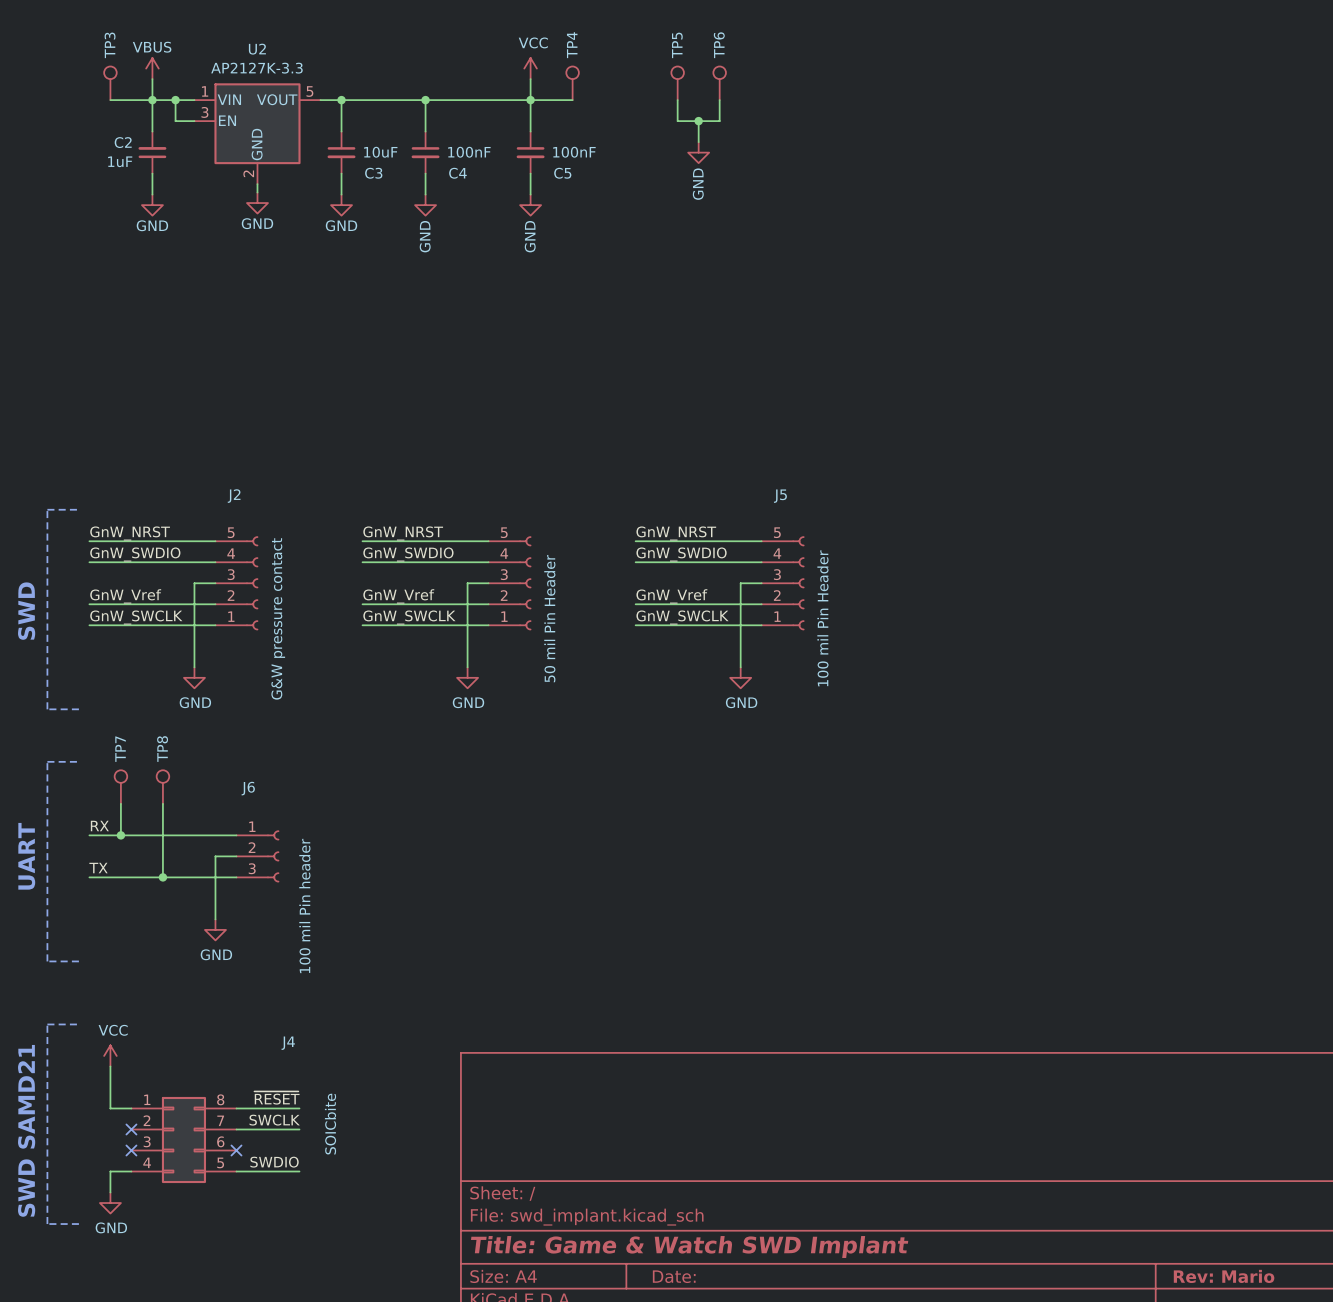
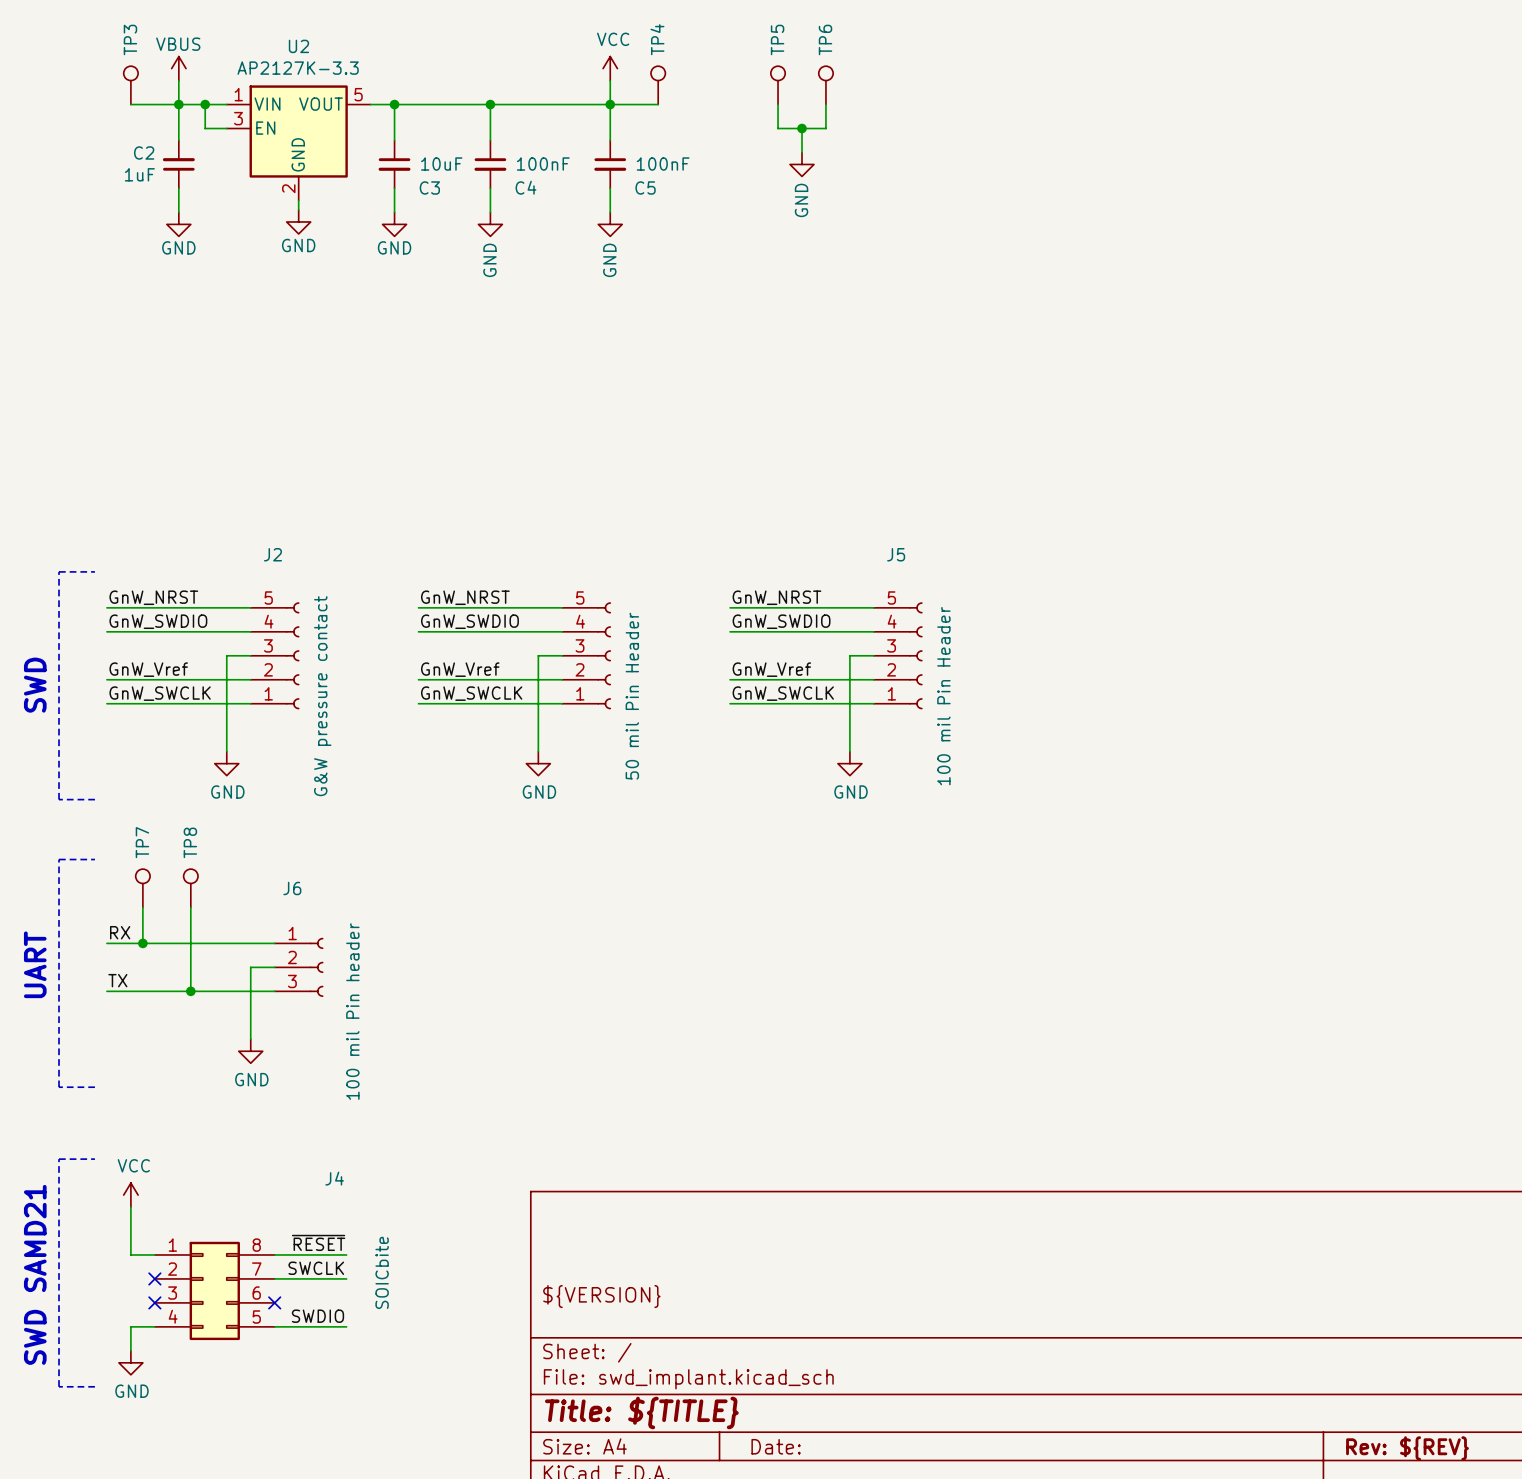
title block: none -> ${VERSION} (601, 1296)
title block: Title: Game & Watch SWD Implant (689, 1247) -> Title: ${TITLE} (641, 1412)
title block: Rev: Mario (1224, 1276) -> Rev: ${REV} (1407, 1448)

